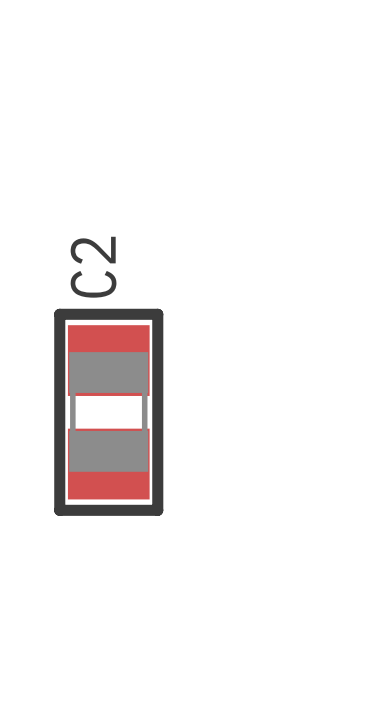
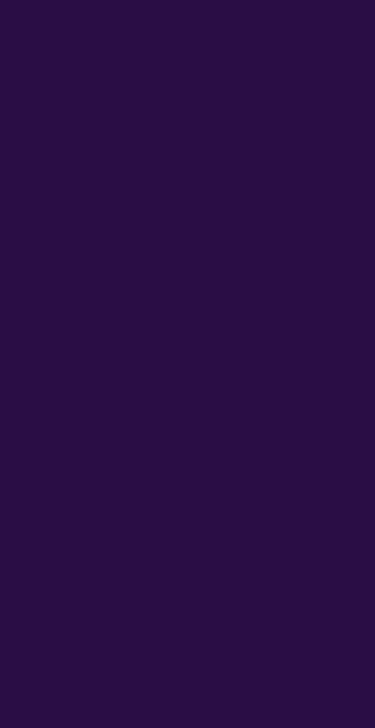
C2: (108, 412) -> none

